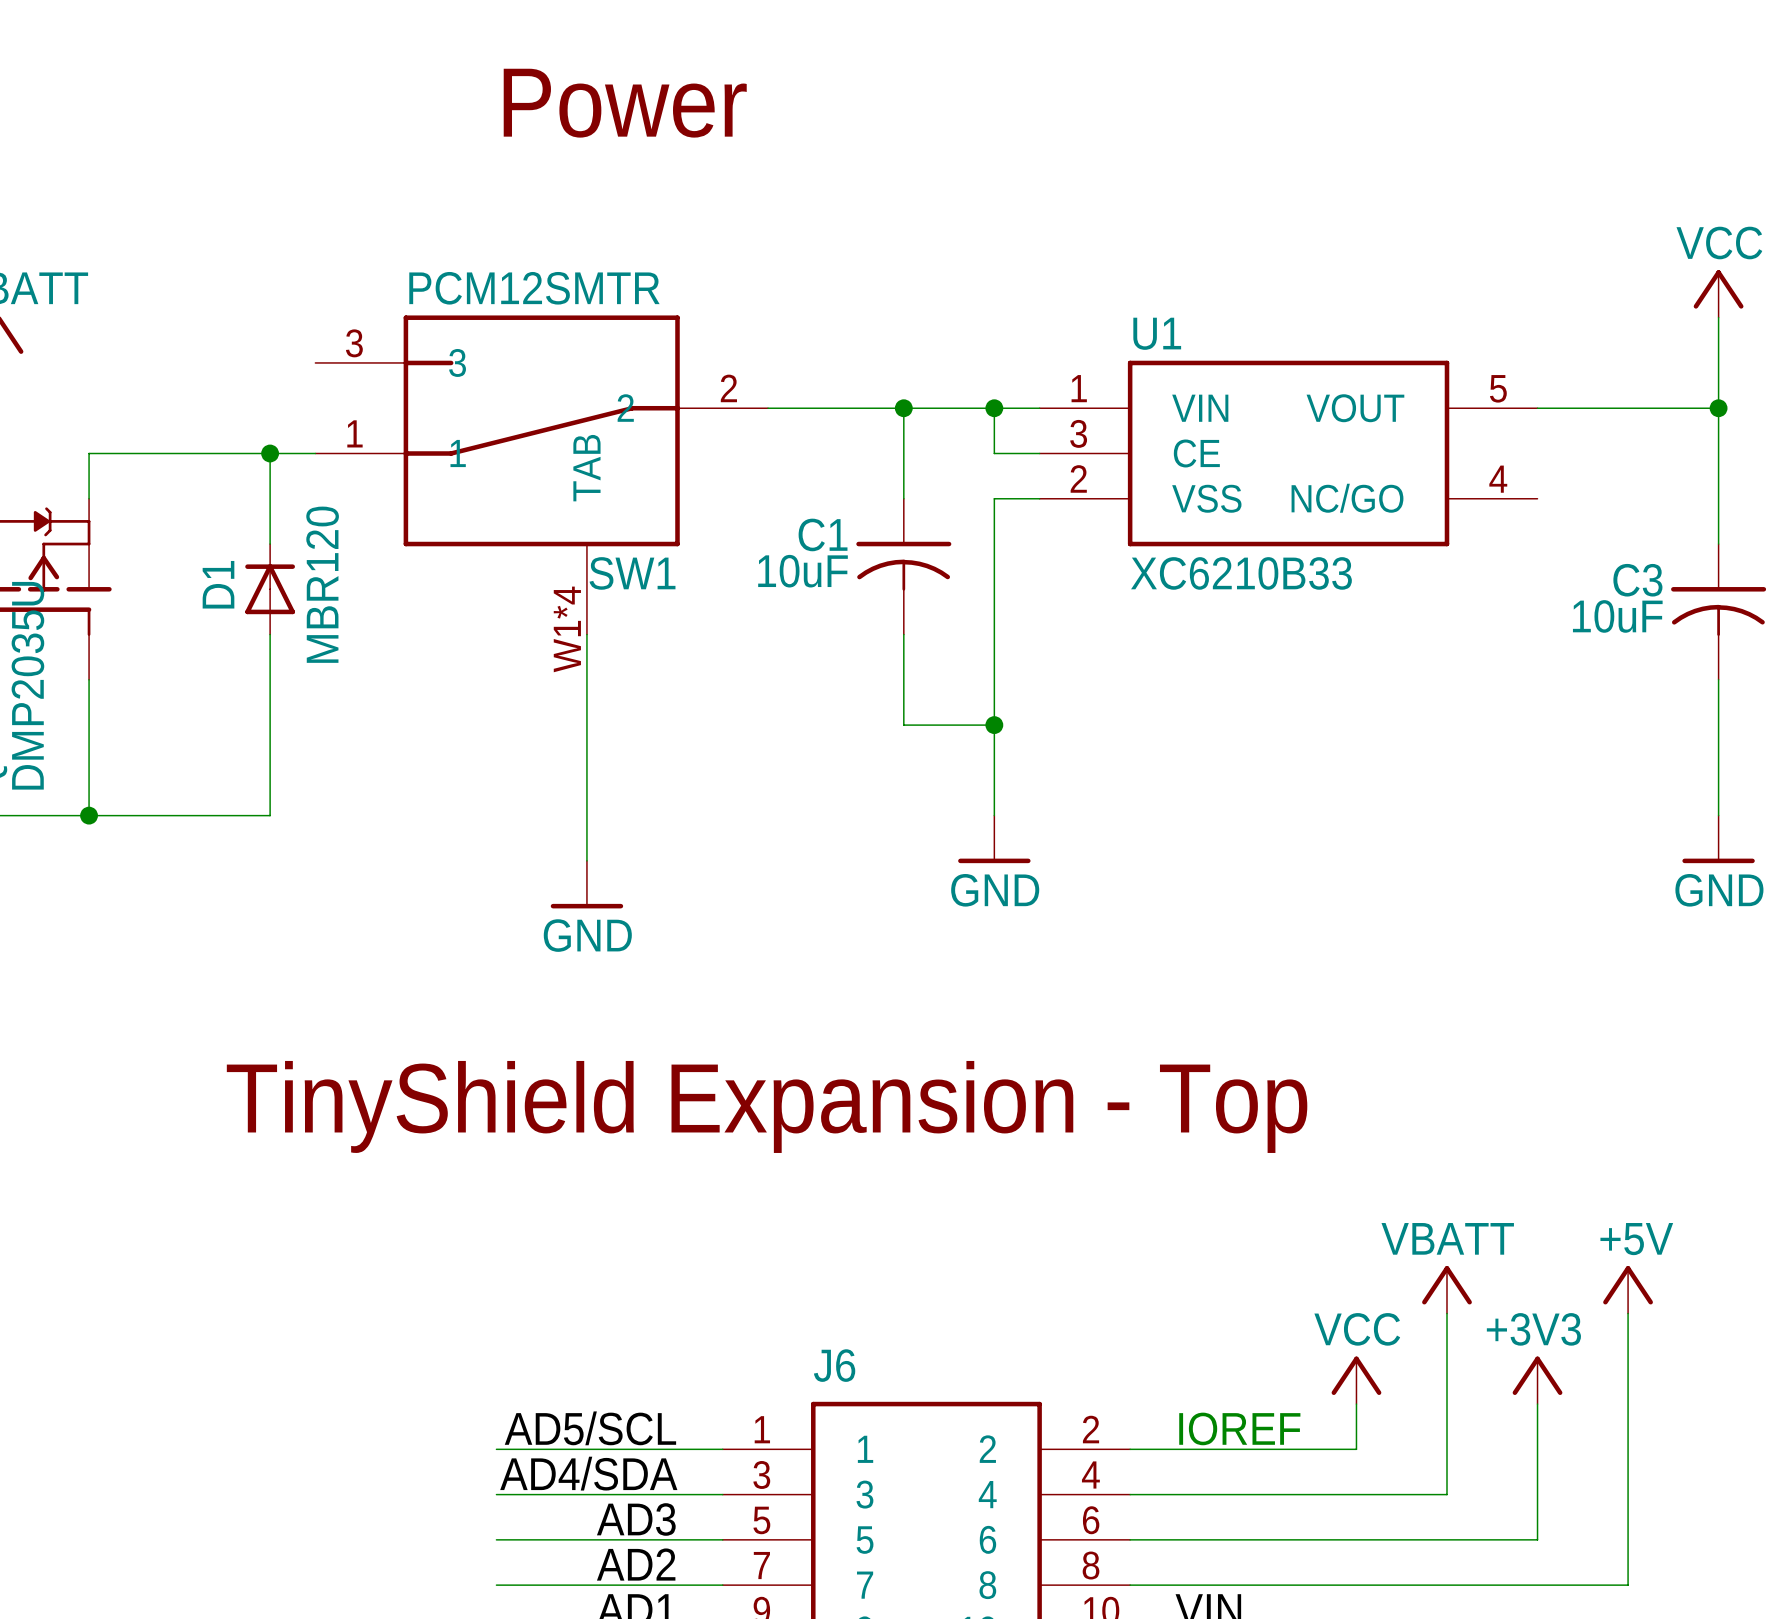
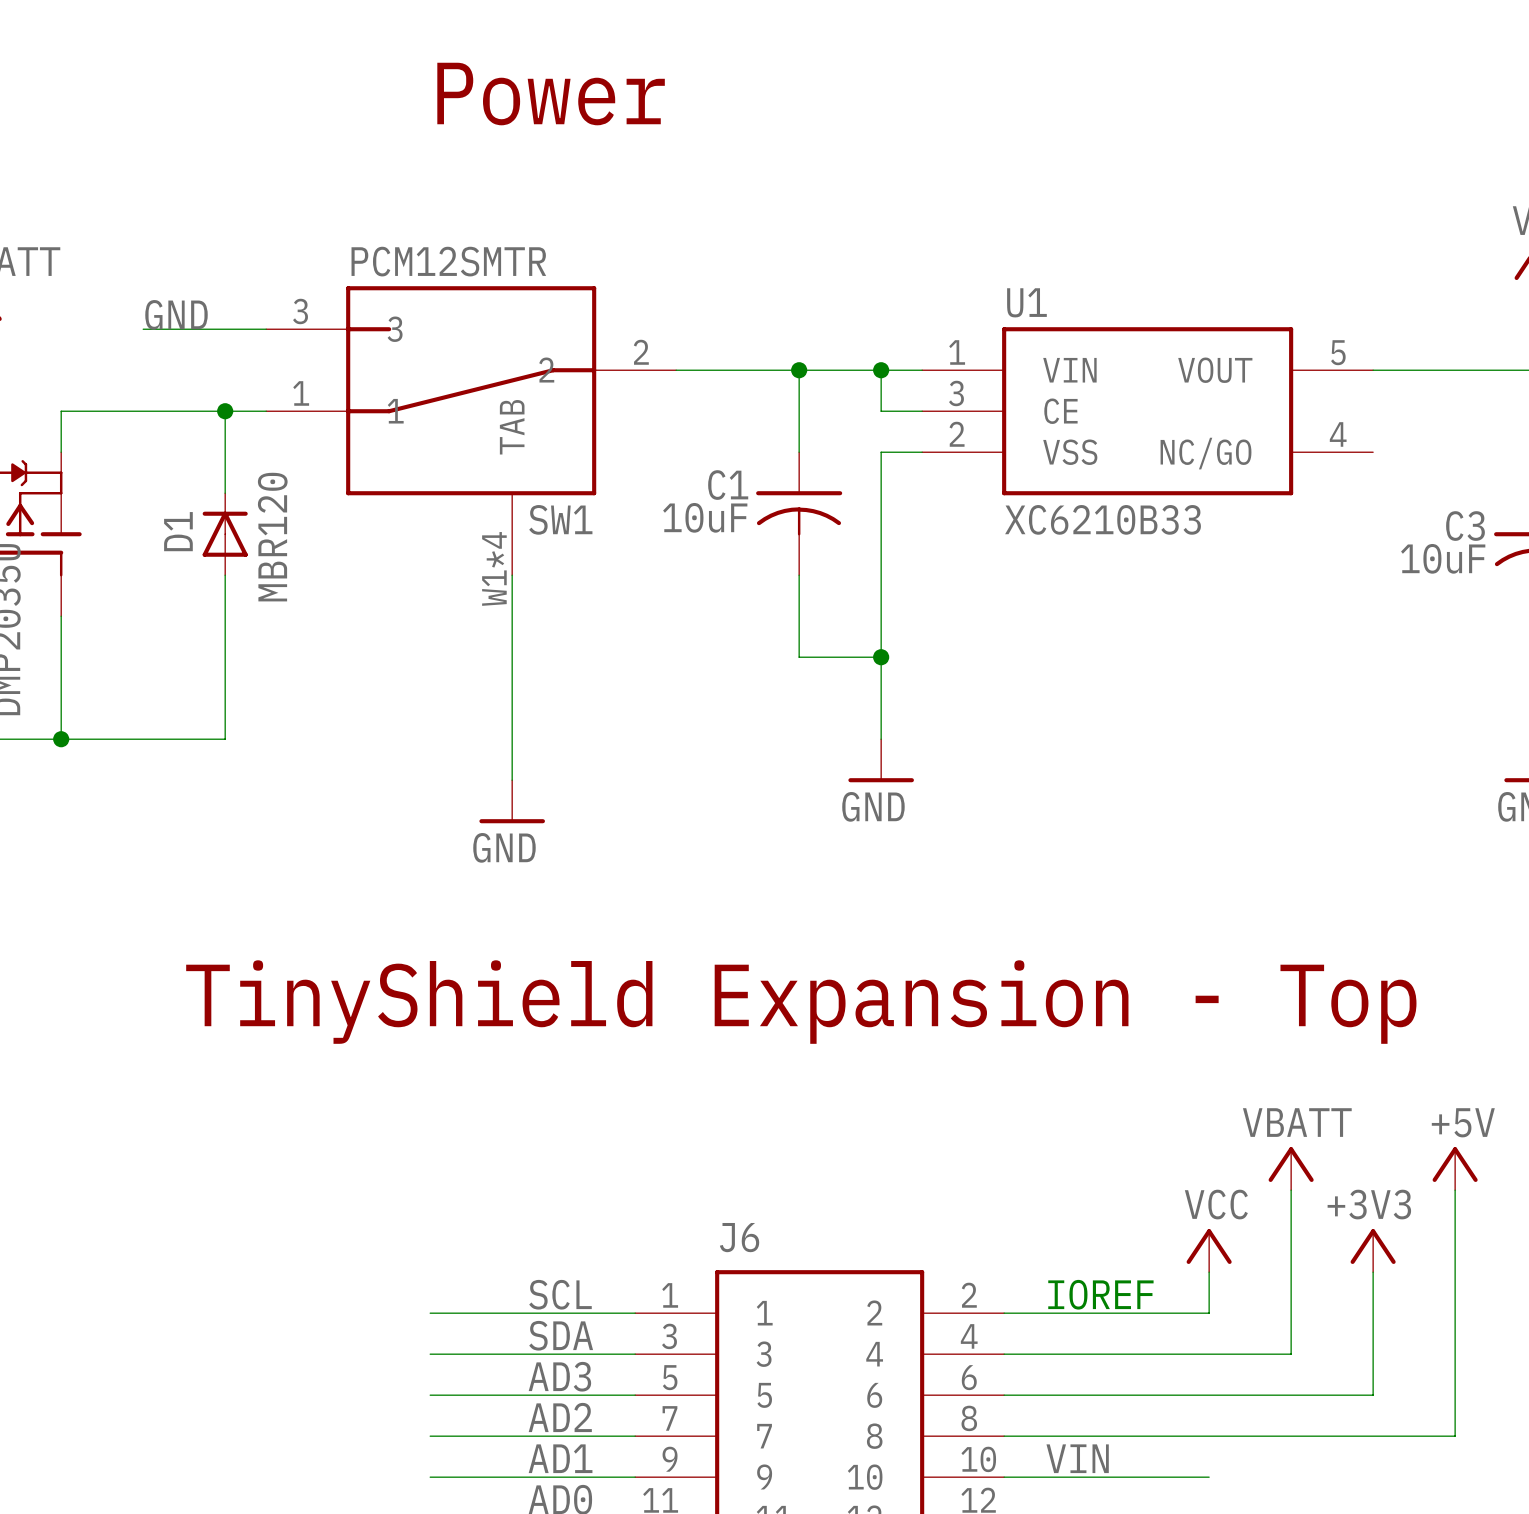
label: none -> GND (176, 314)
wire: none -> (143, 329) (266, 329)
label: AD5/SCL (590, 1428) -> SCL (560, 1294)
label: AD4/SDA (588, 1473) -> SDA (561, 1335)

